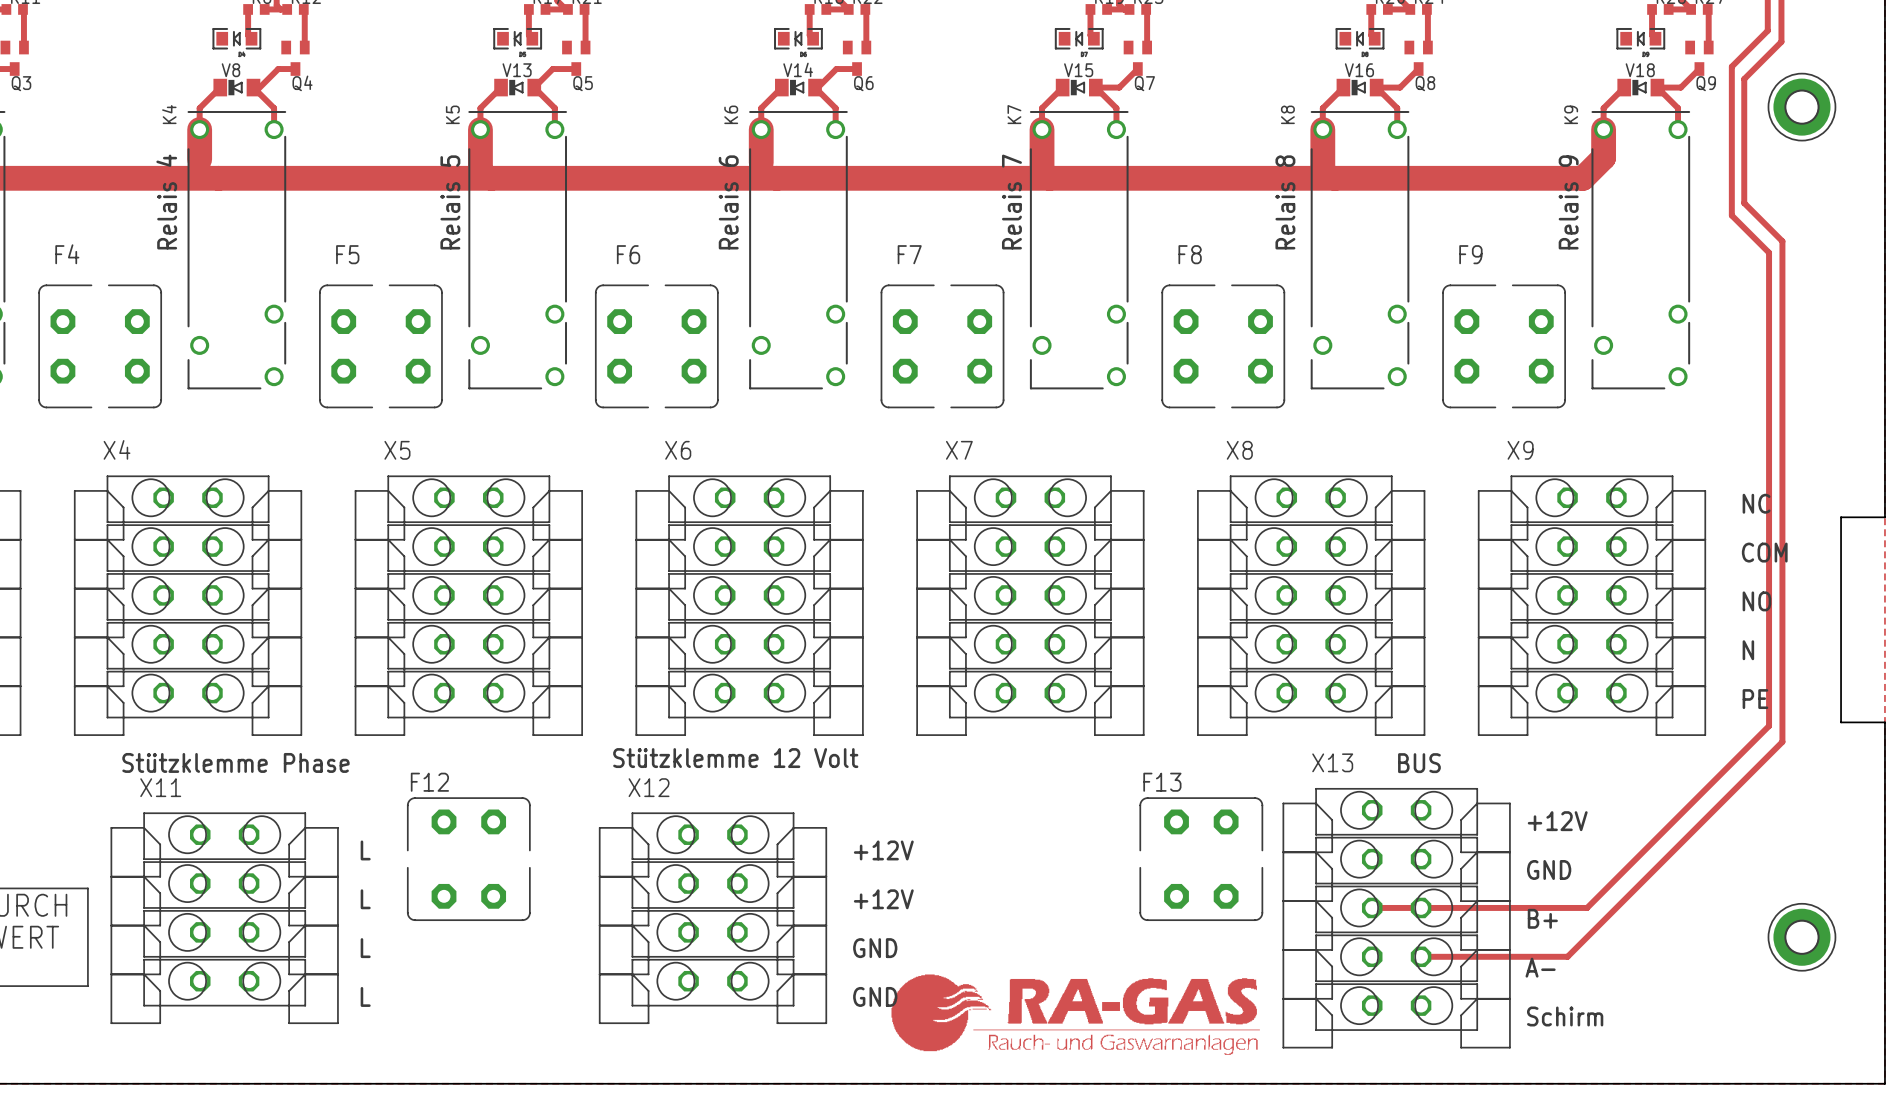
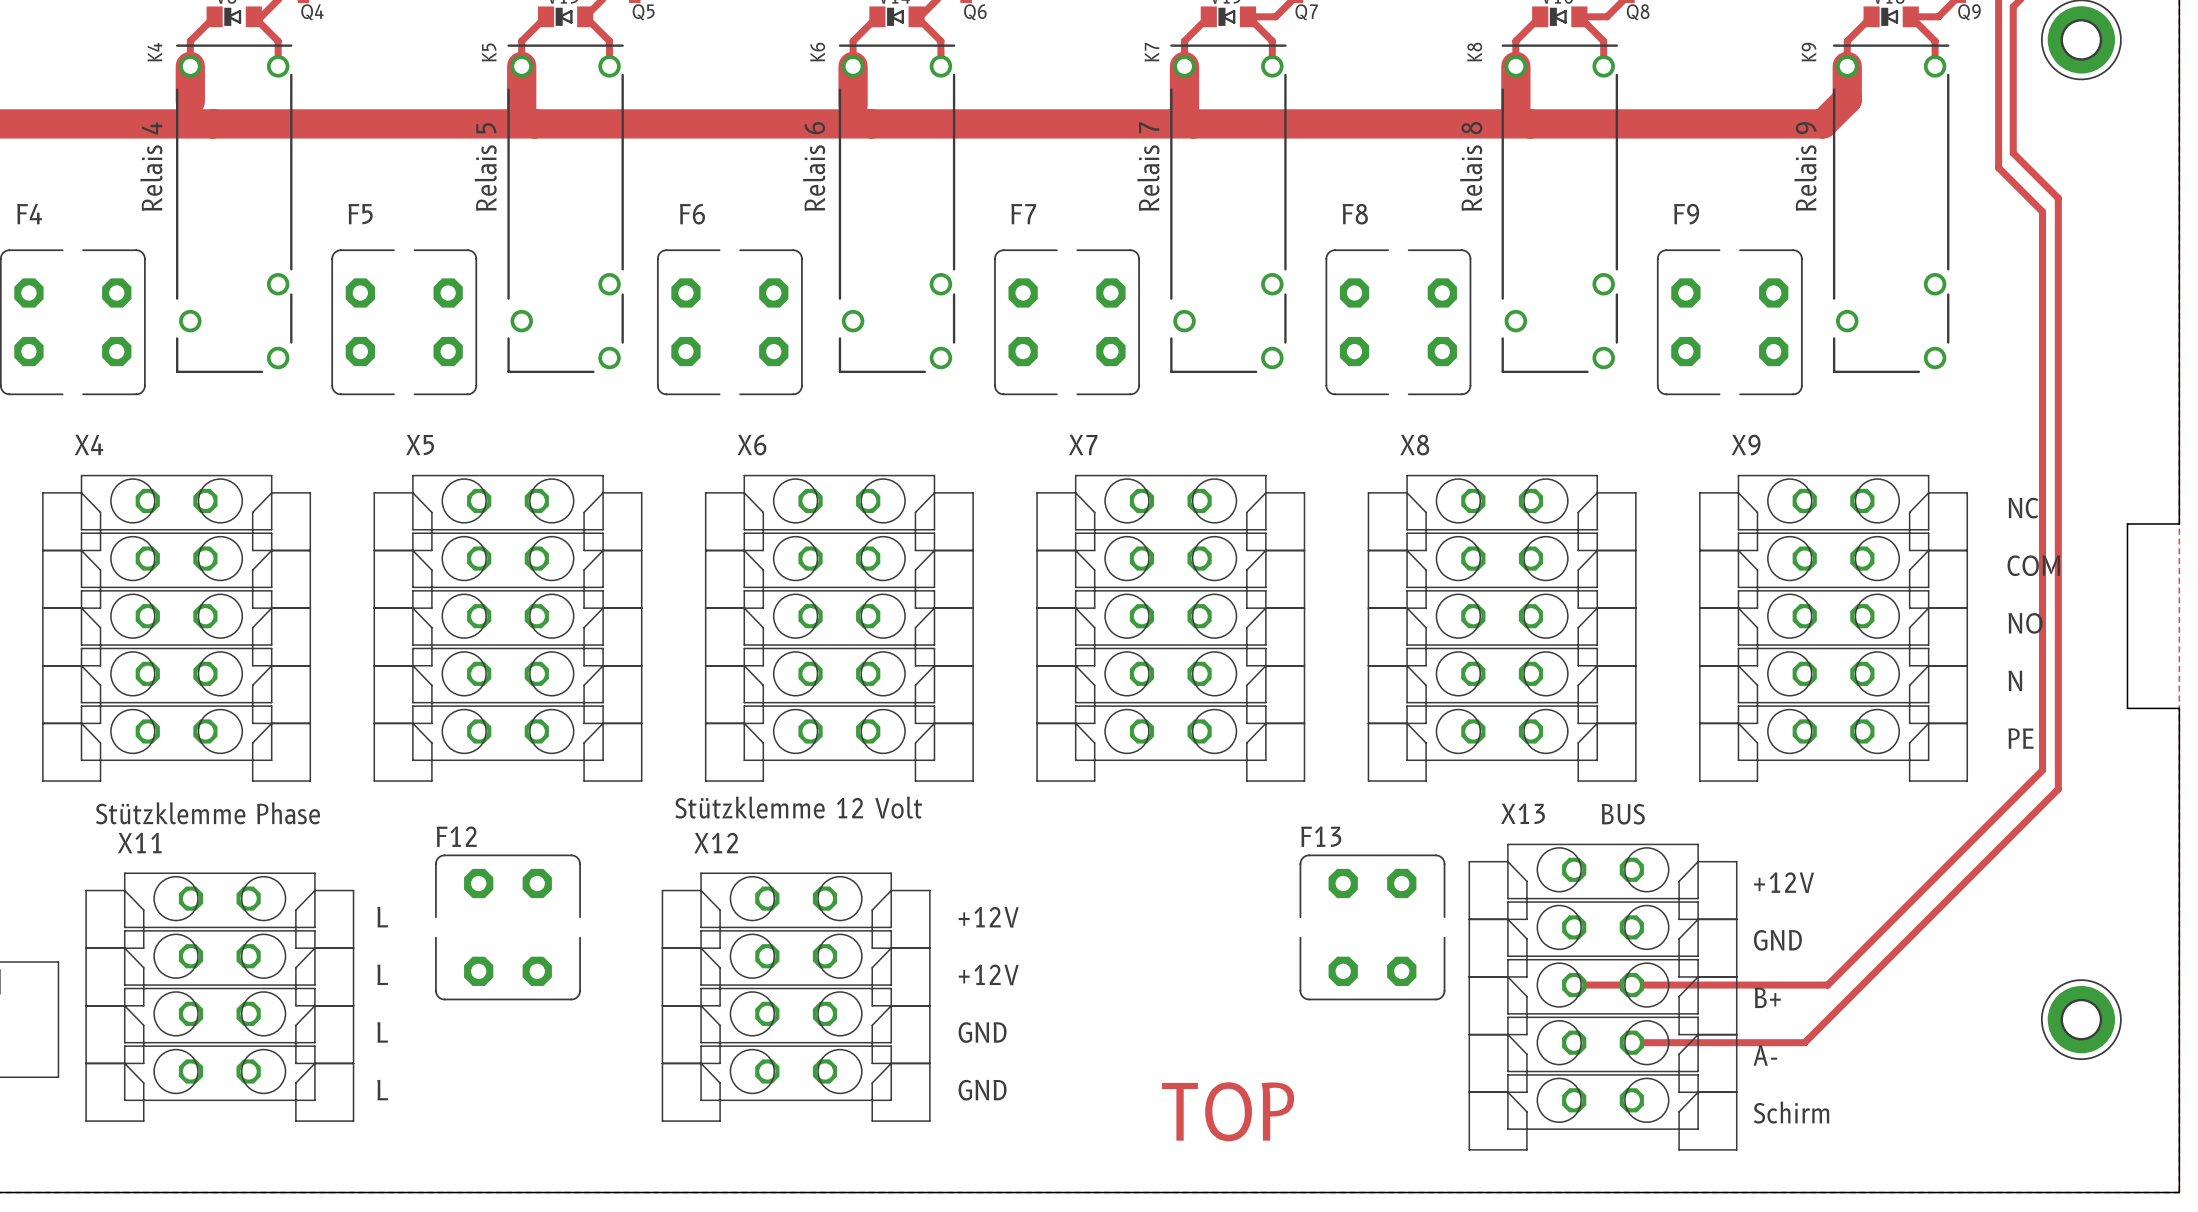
board edge: (1841, 673) (1841, 722) (1884, 722) -> (2127, 708) (2179, 708) (2179, 766)
drawing: [891, 974, 1260, 1055] -> none
text: none -> TOP (1228, 1111)

